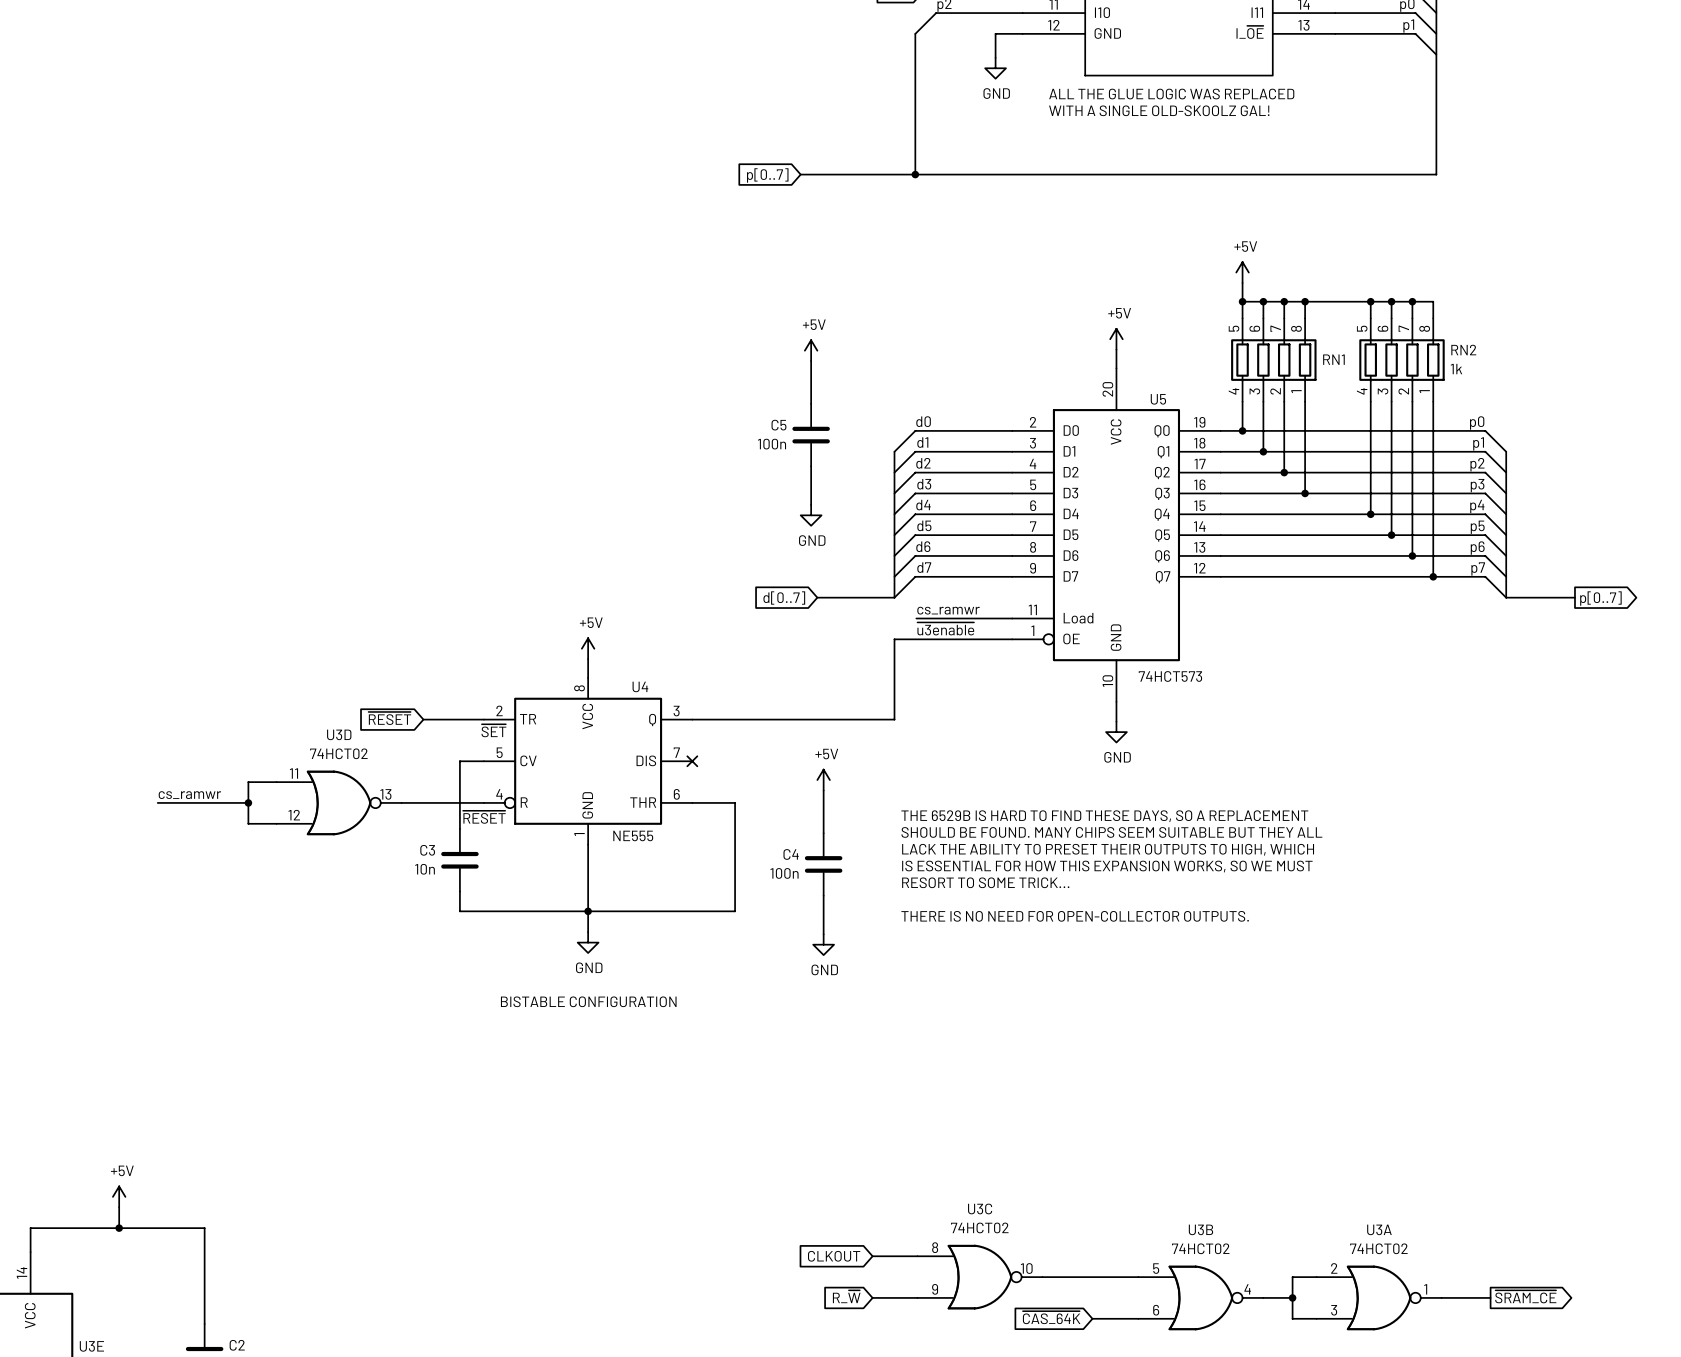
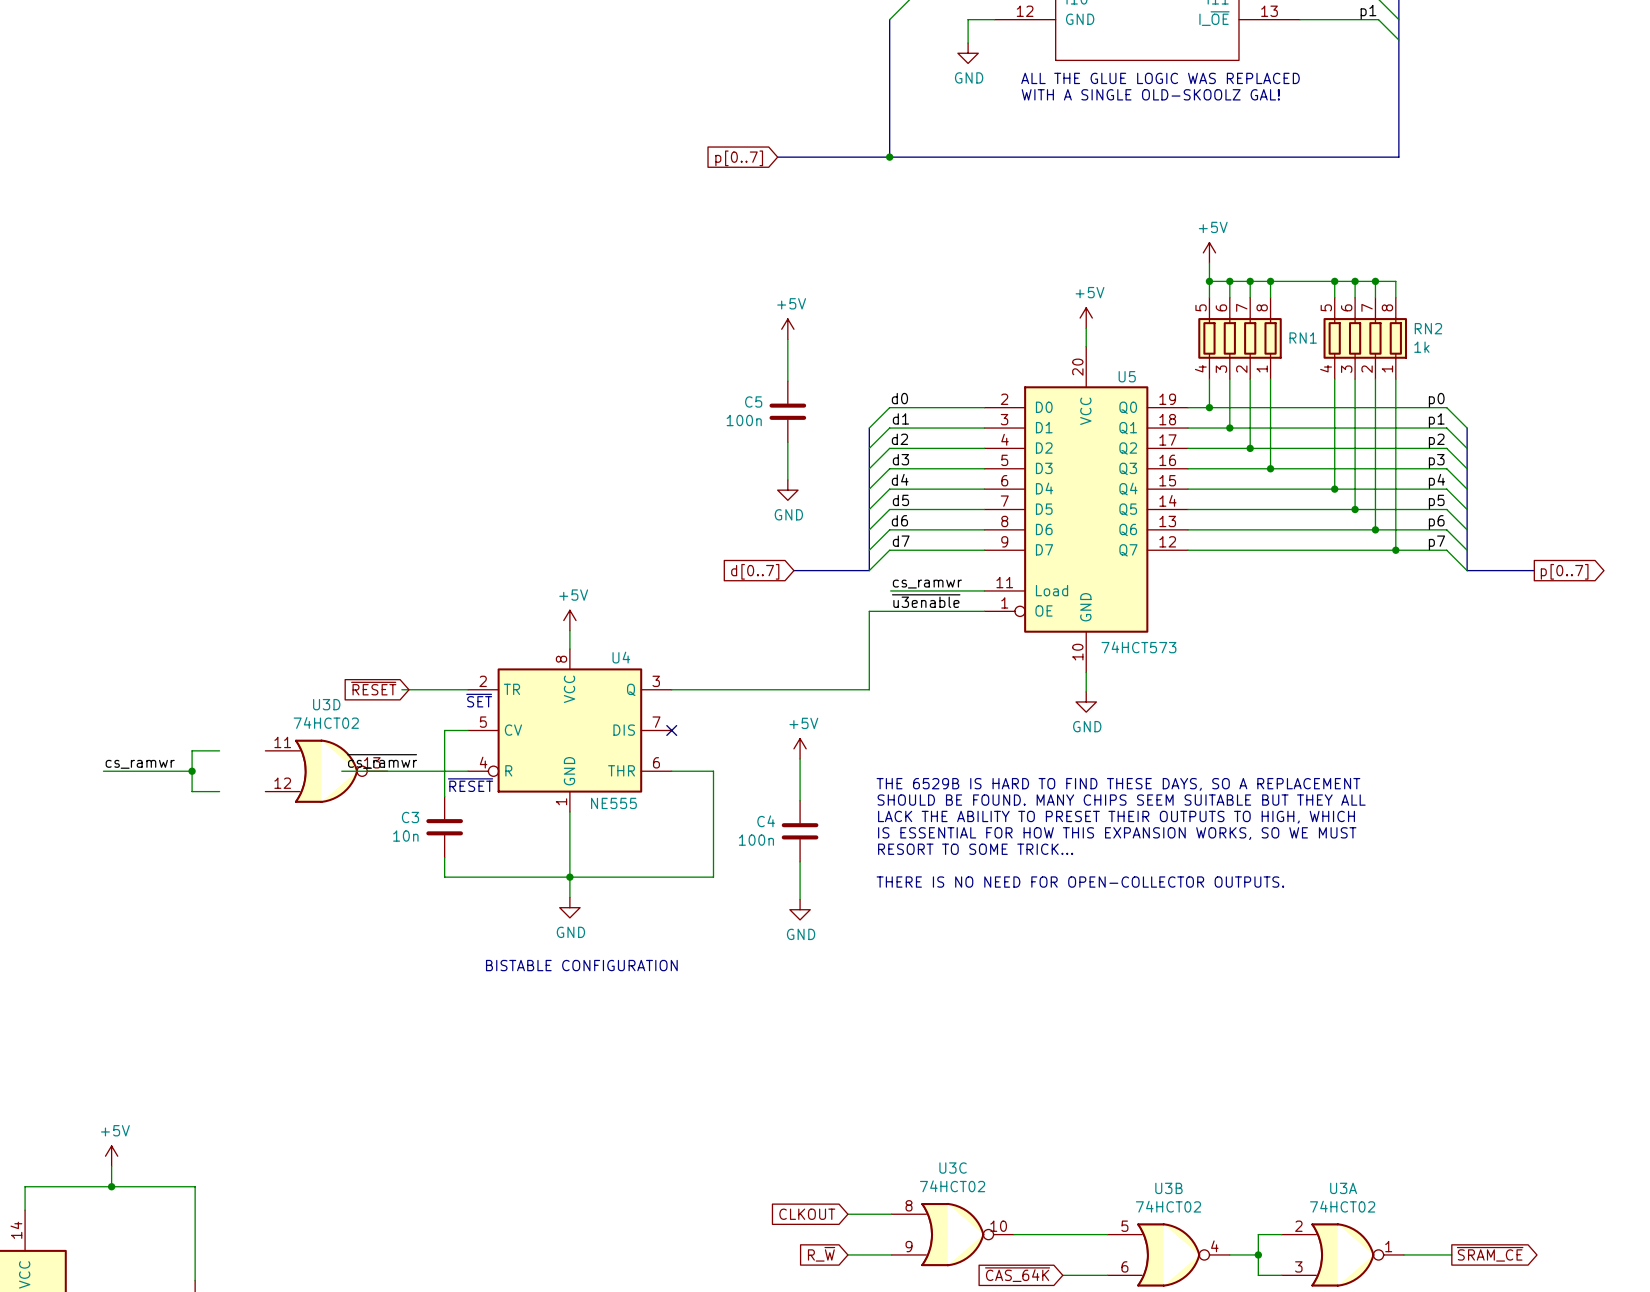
wire: none -> (401, 689) (408, 689)
wire: (276, 782) (248, 782) (248, 823) (276, 823) -> (219, 750) (192, 750) (192, 791) (219, 791)
label: none -> ~{cs_ramwr} (382, 761)
label position: cs_ramwr (189, 795) -> cs_ramwr (140, 764)
wire: (201, 802) (248, 802) -> (103, 771) (149, 771)
junction position: (248, 802) -> (192, 771)
wire: none -> (341, 771) (387, 771)

